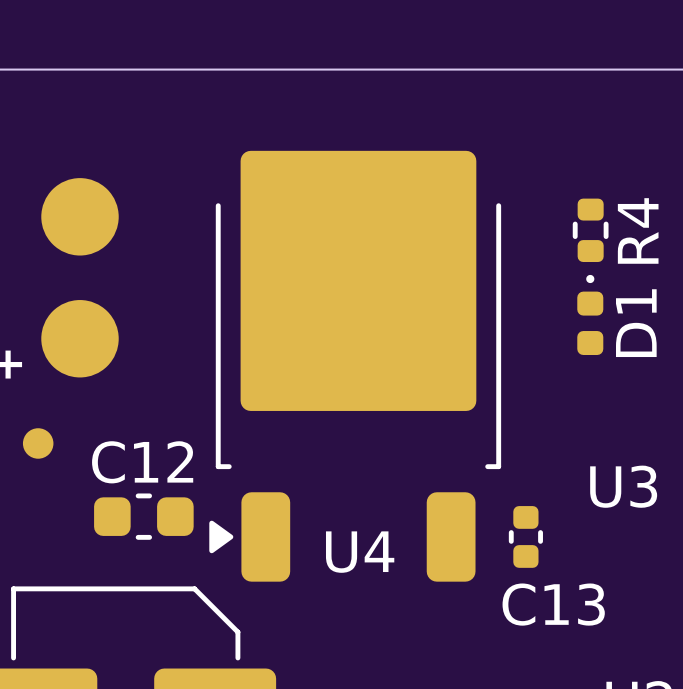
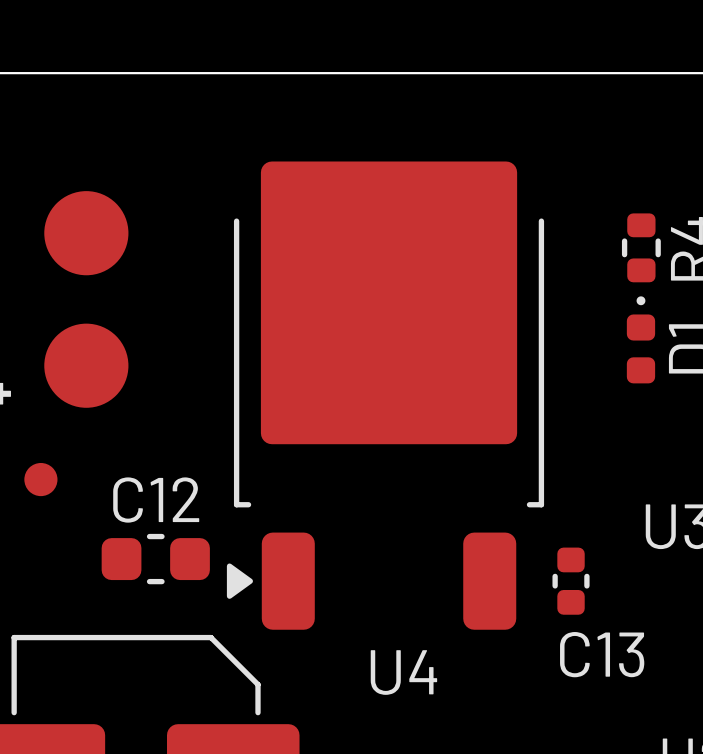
U4 name position: U4 (360, 552) -> U4 (403, 672)

